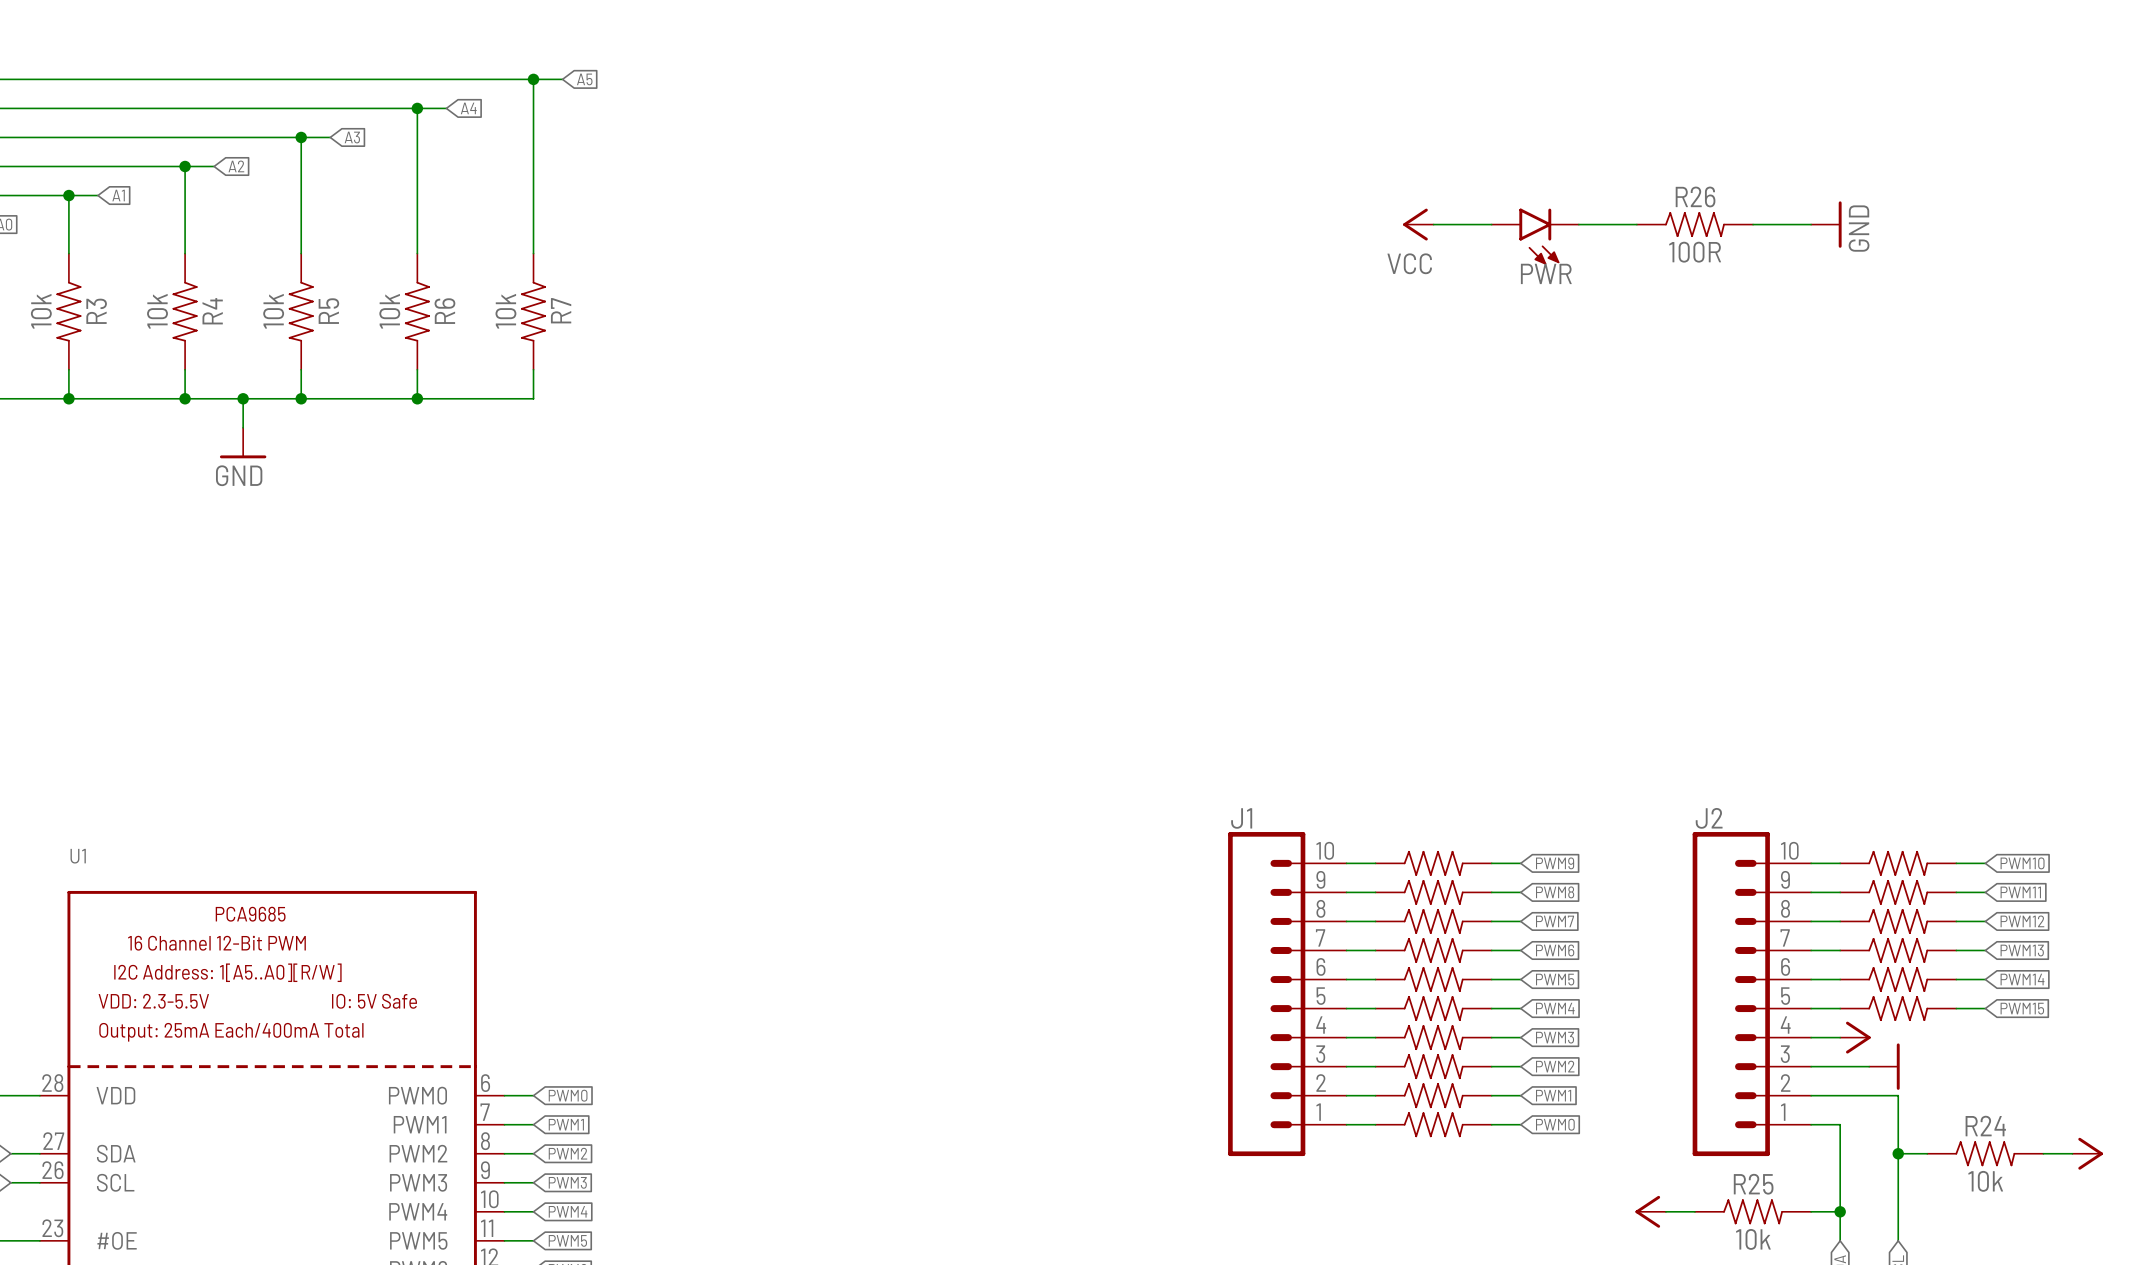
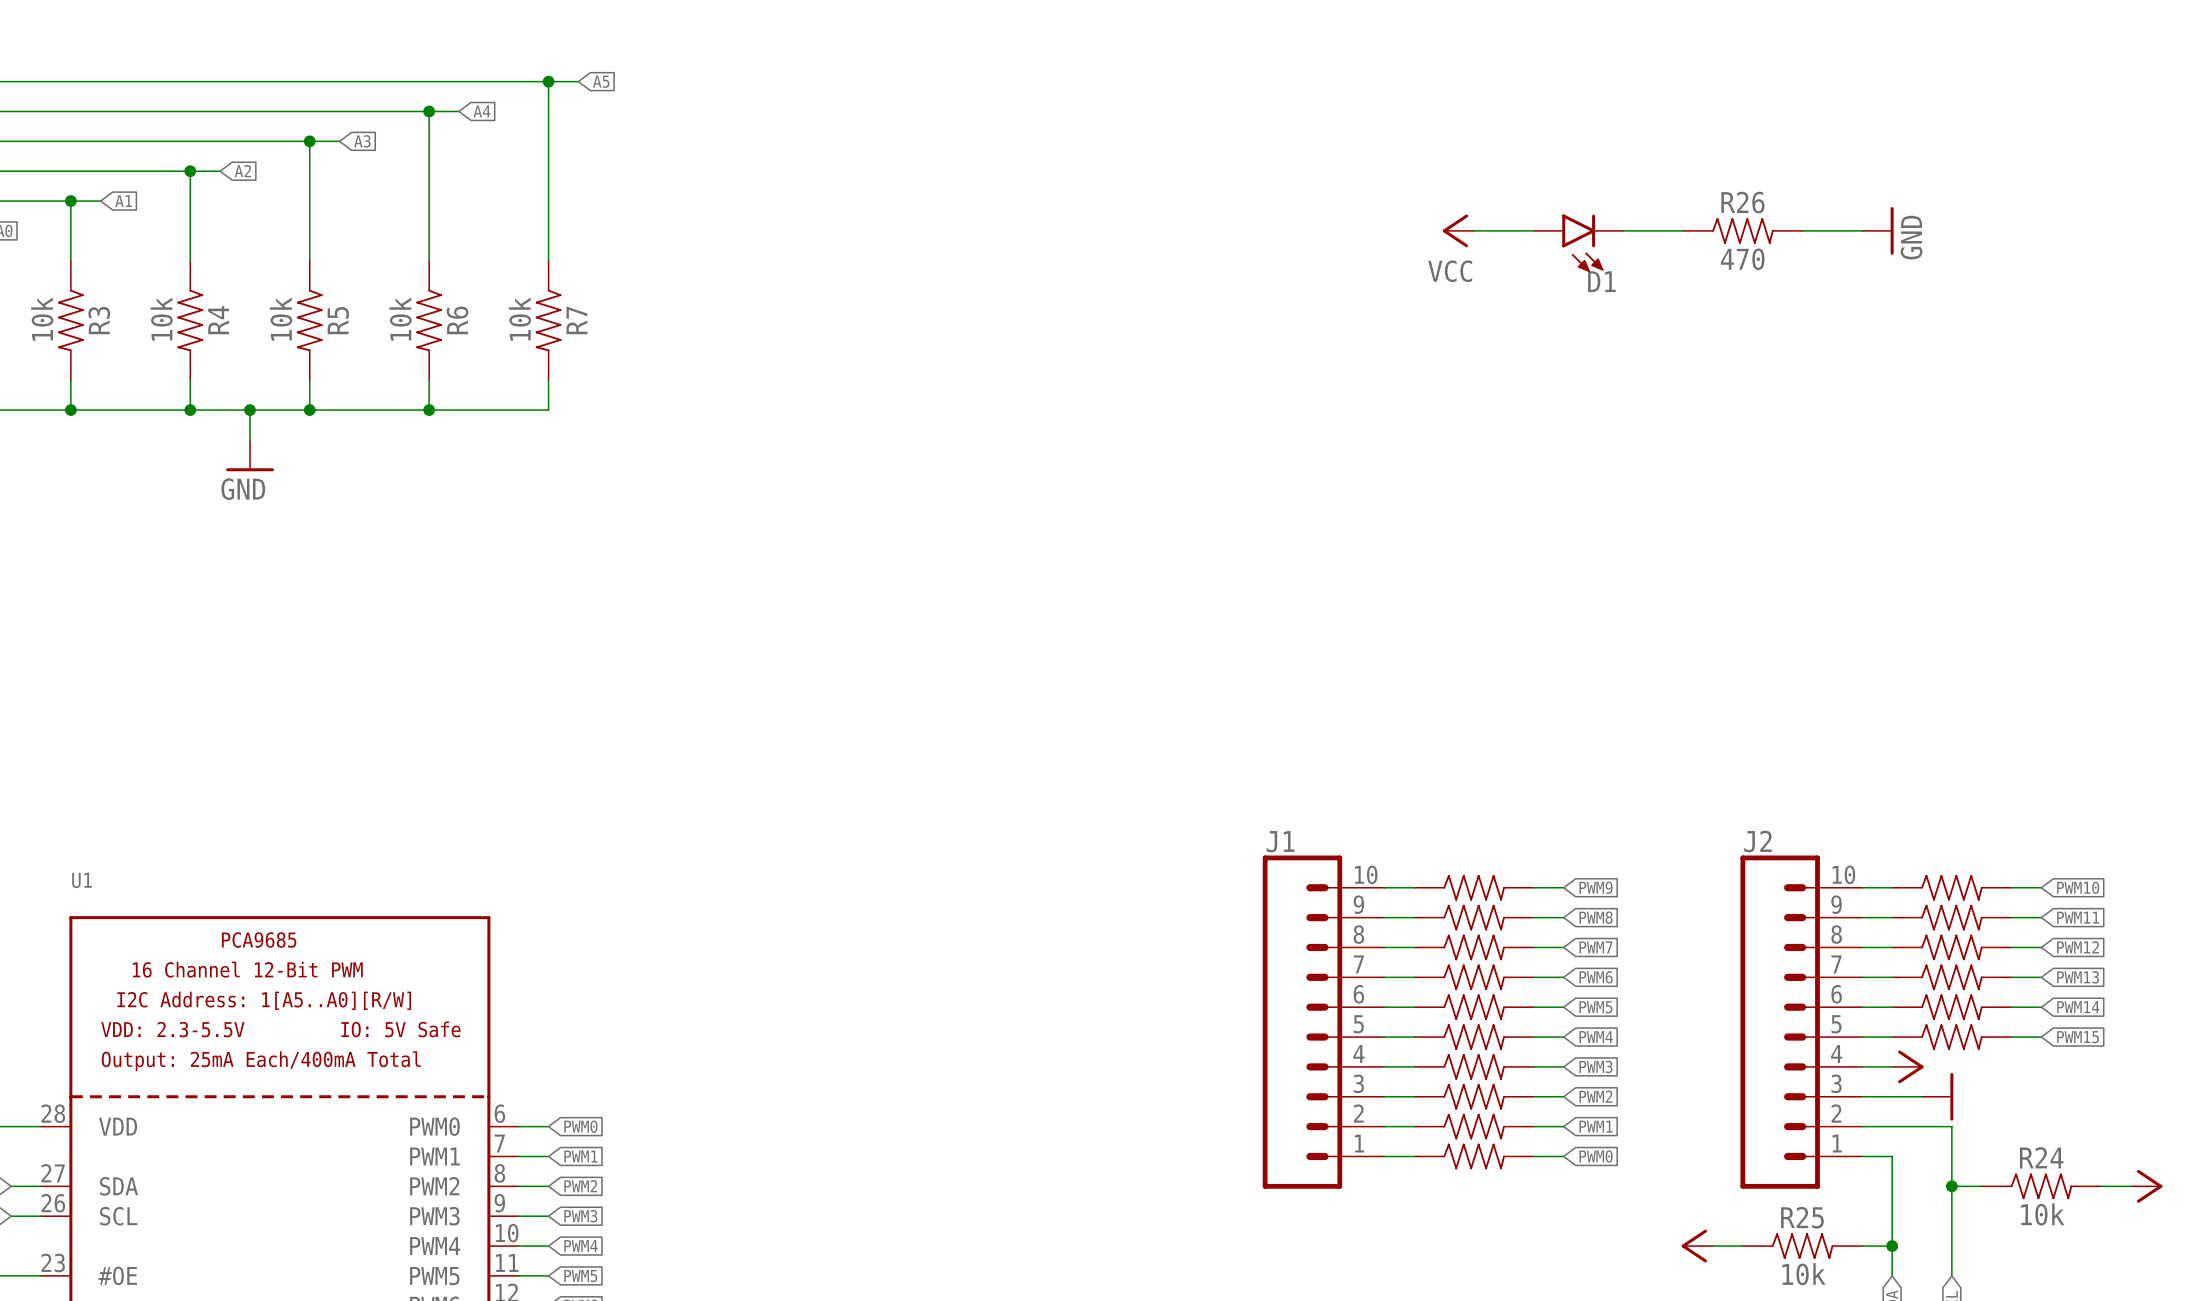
R26 value: 100R (1695, 252) -> 470 (1742, 259)
PWR name: PWR (1546, 273) -> D1 (1601, 281)

